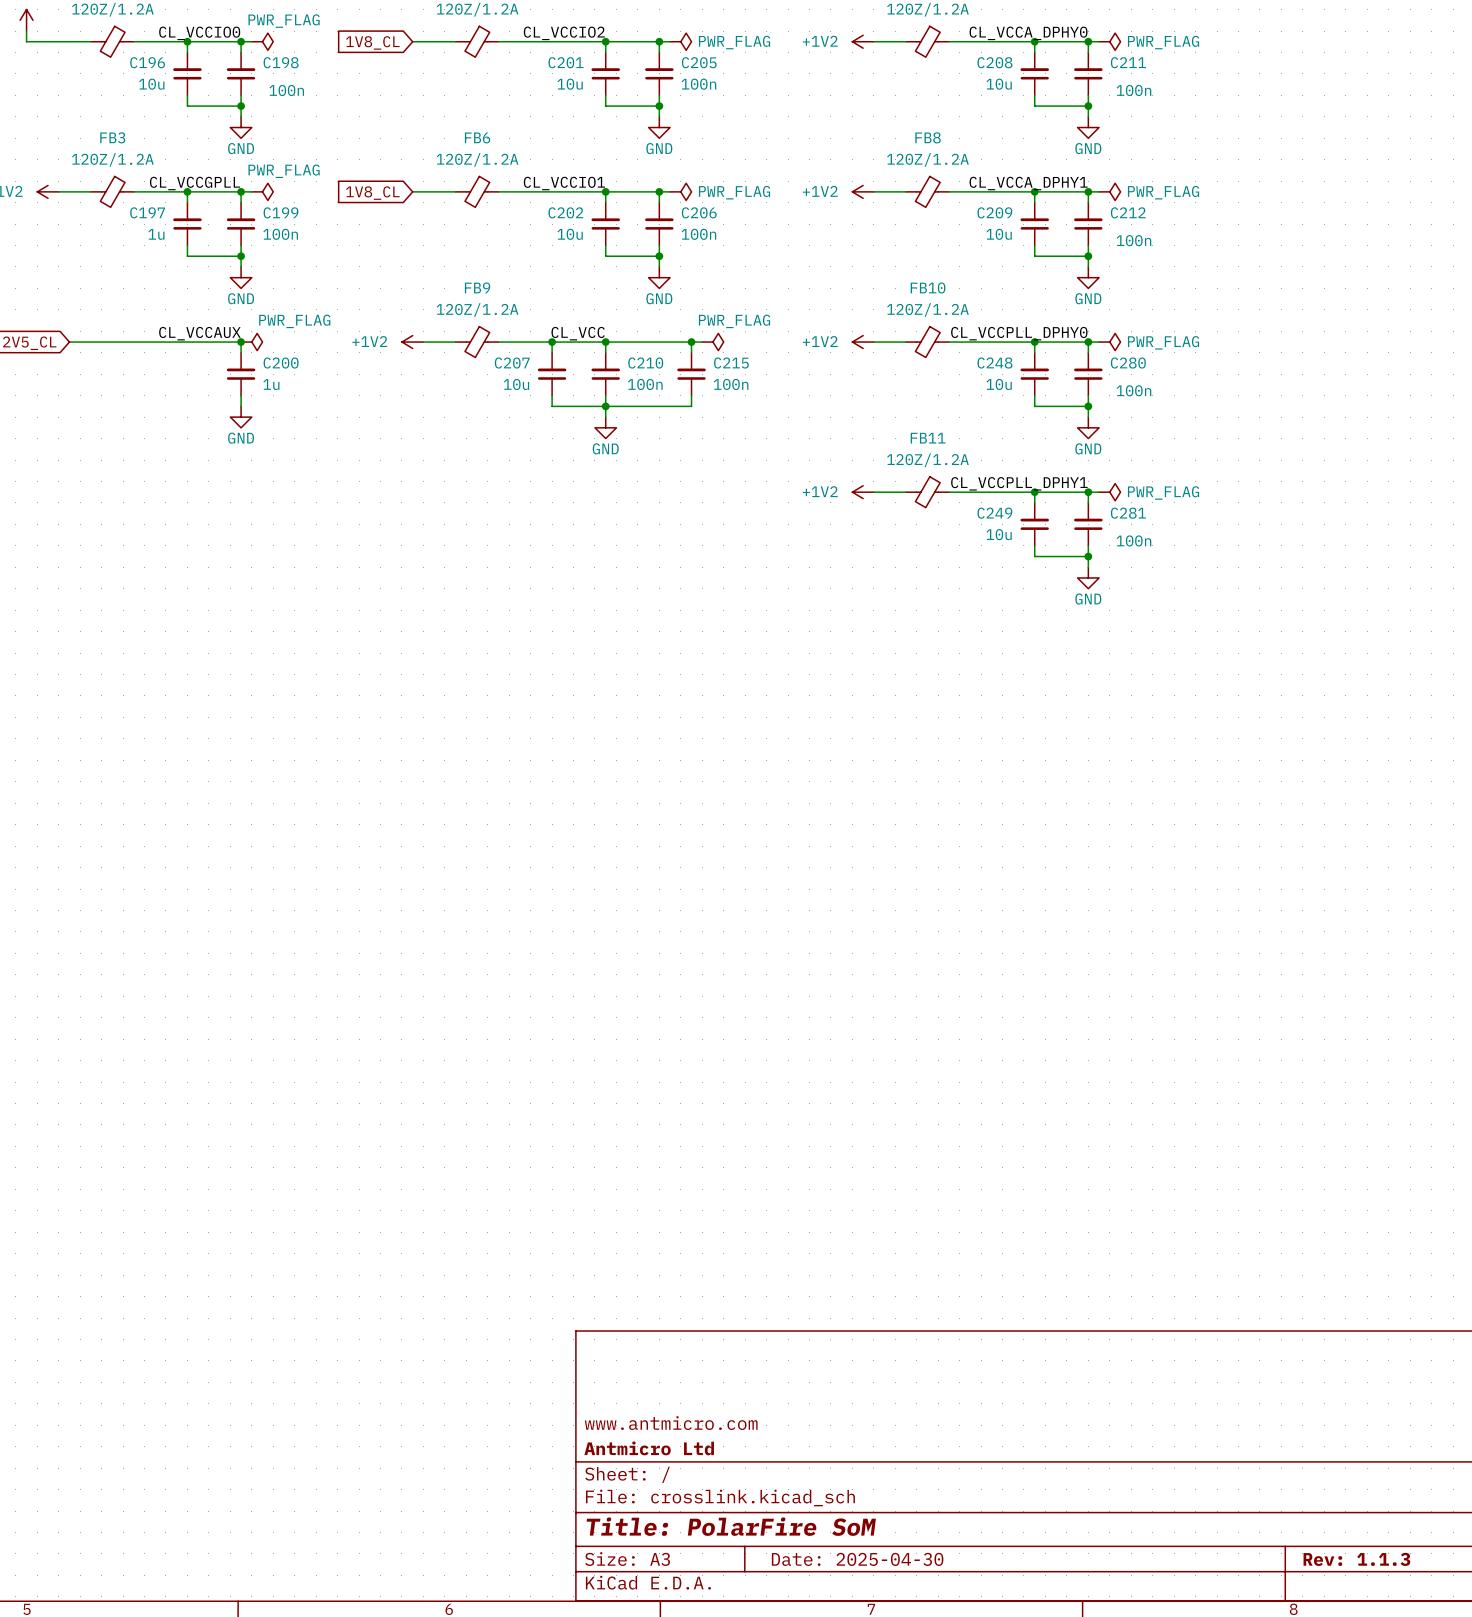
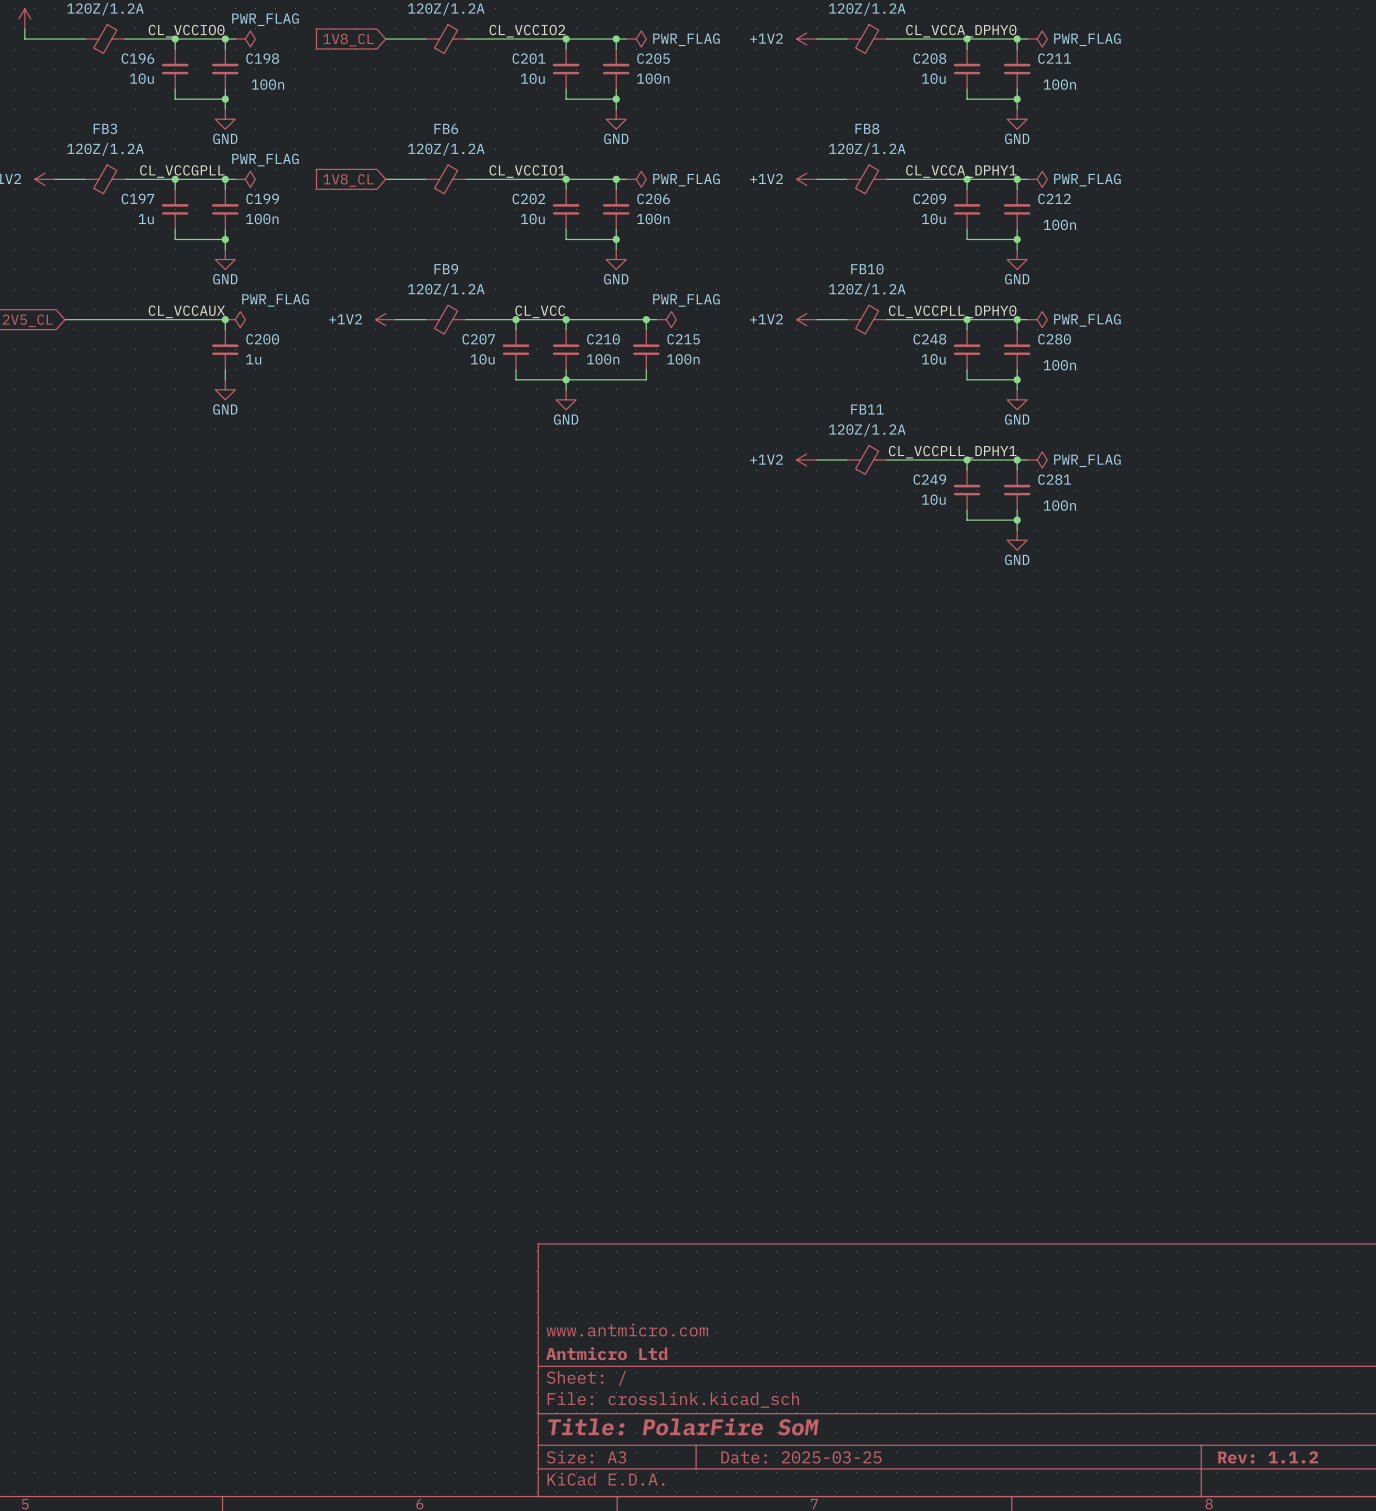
title block: Date: 2025-04-30 (857, 1559) -> Date: 2025-03-25 (801, 1457)
title block: Rev: 1.1.3 (1356, 1559) -> Rev: 1.1.2 (1268, 1457)

